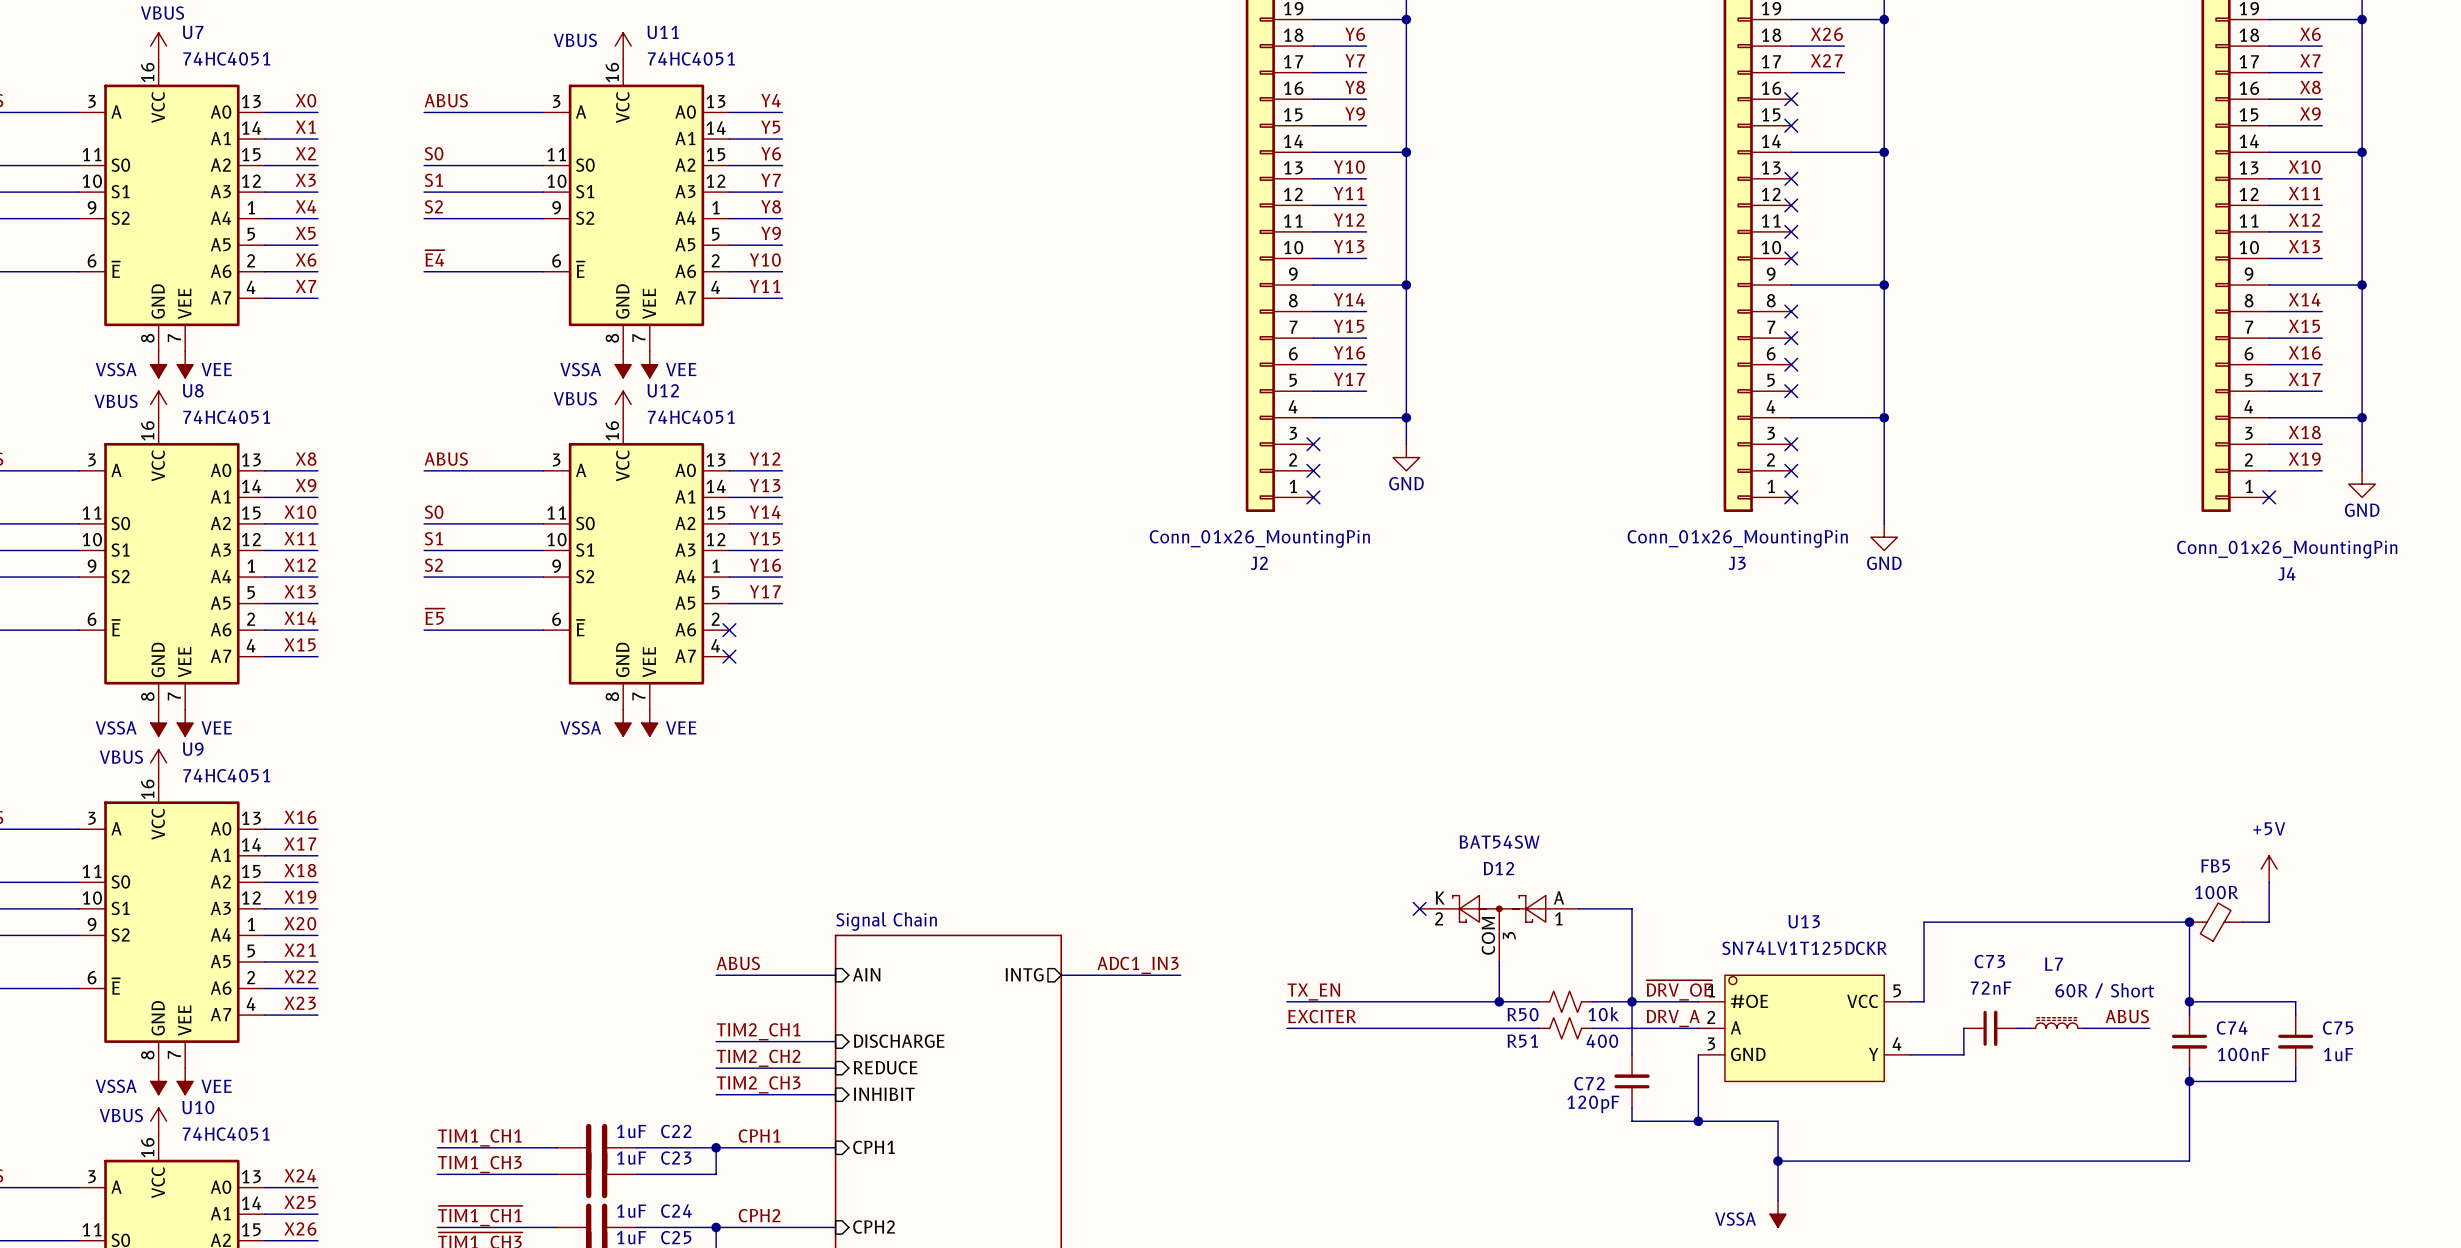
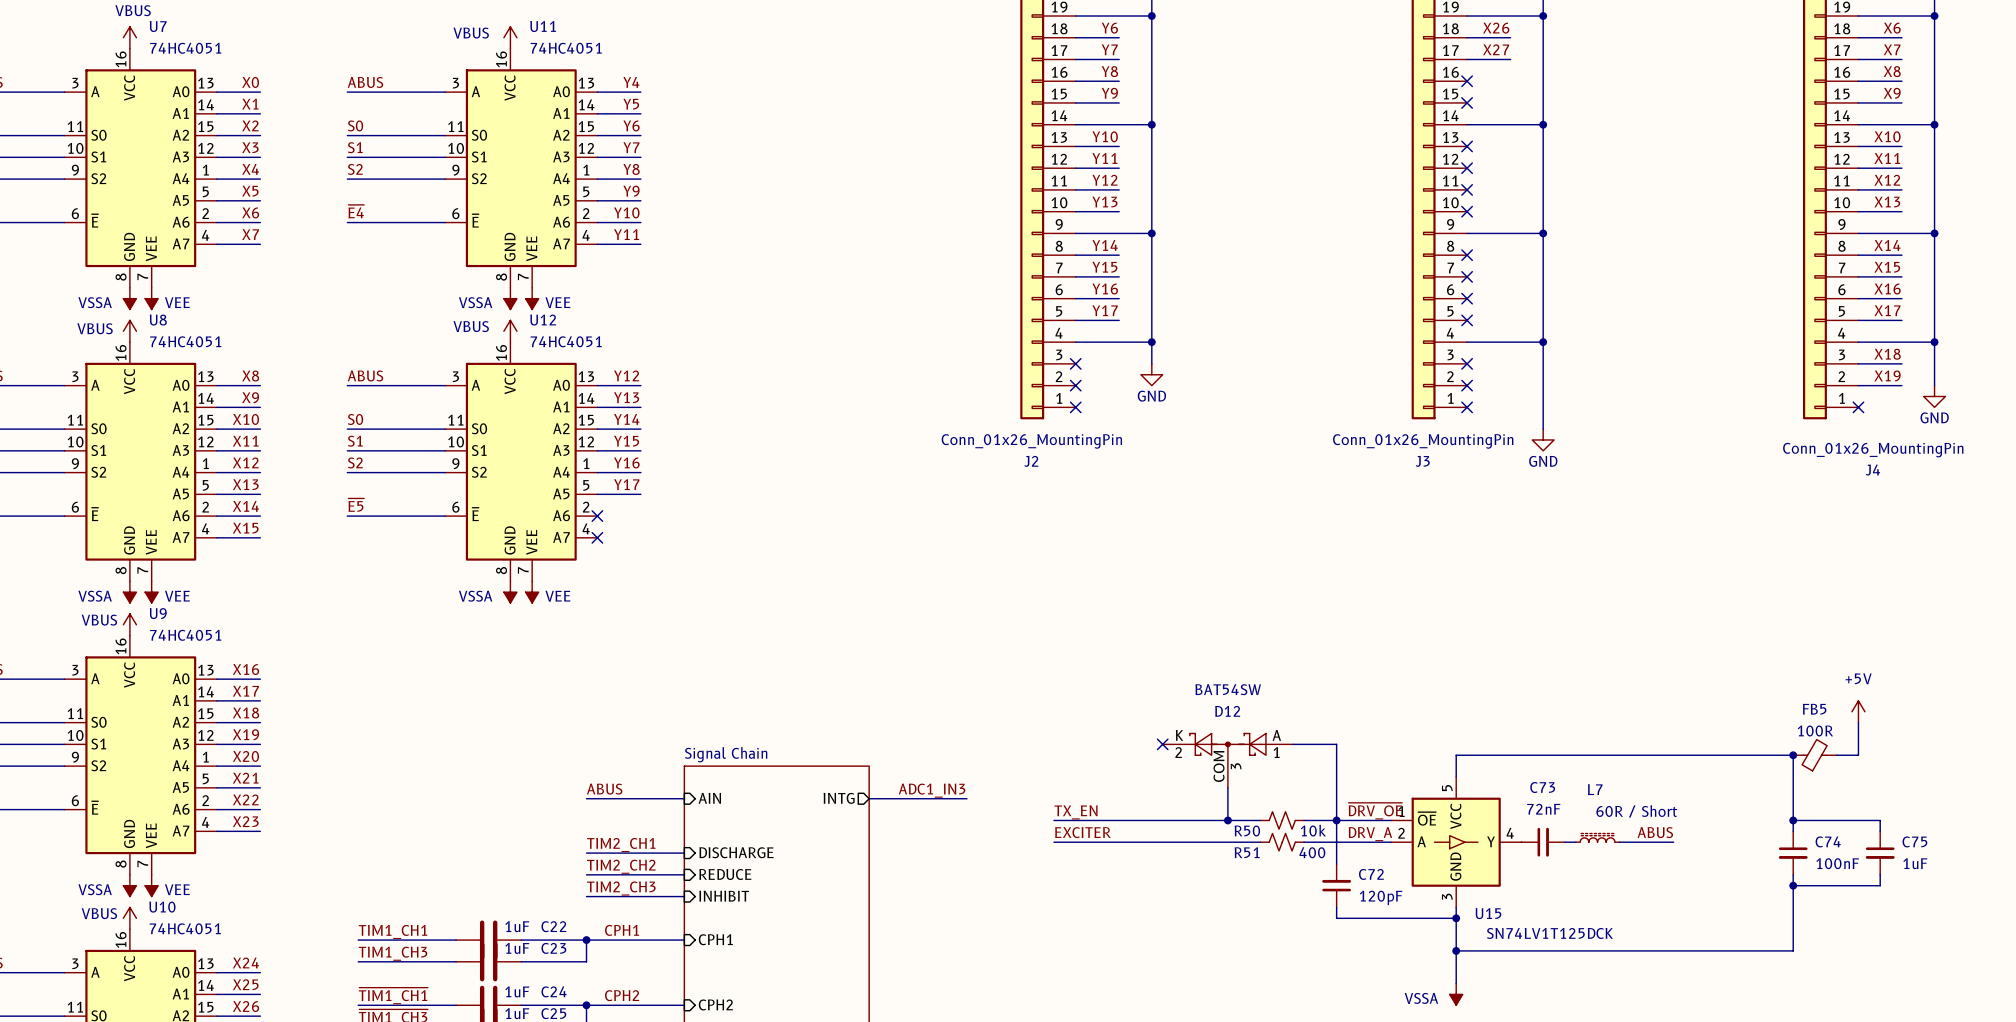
wire: (1924, 922) (1924, 1001) (1910, 1001) -> (1575, 755) (1456, 755) (1456, 776)
label position: ABUS (2127, 1016) -> ABUS (1655, 832)
L7 position: (2056, 1023) -> (1597, 837)
U15: none -> SN74LV1T125DCK (1456, 842)
U13: SN74LV1T125DCKR (1804, 1028) -> none
wire: none -> (1564, 842) (1575, 842)
wire: (1963, 1028) (1963, 1054) (1910, 1054) -> none
C73 position: (1990, 1028) -> (1543, 842)
wire: none -> (1662, 842) (1673, 842)
wire: (2083, 1028) (2149, 1028) -> none
wire: (1698, 1054) (1698, 1121) -> none
C72 name position: C72 (1589, 1083) -> C72 (1371, 874)
C72 value position: 120pF (1593, 1104) -> 120pF (1381, 897)
wire: none -> (1456, 907) (1456, 918)
junction: (1698, 1121) -> none
junction: none -> (1456, 918)

